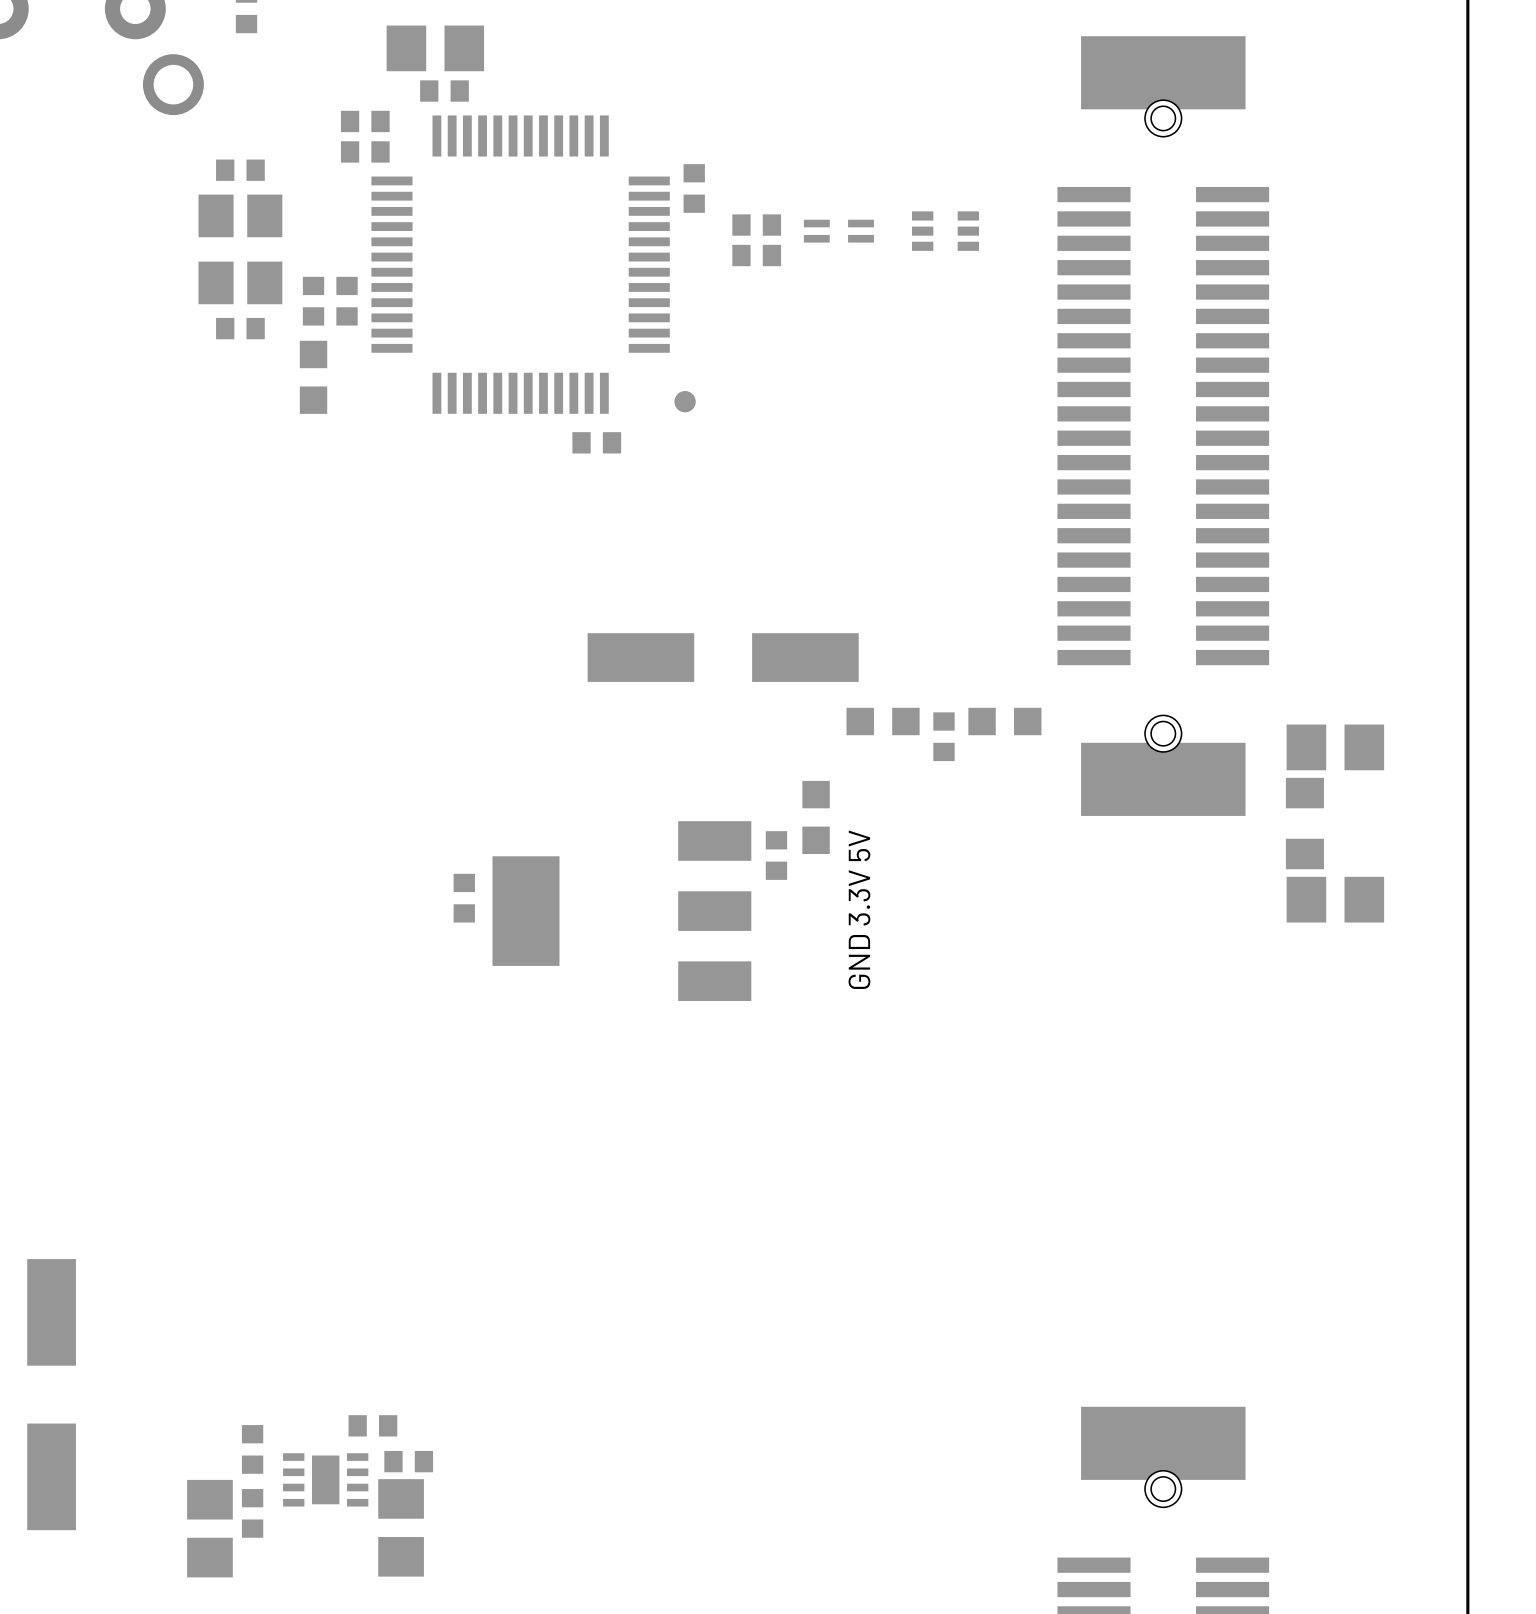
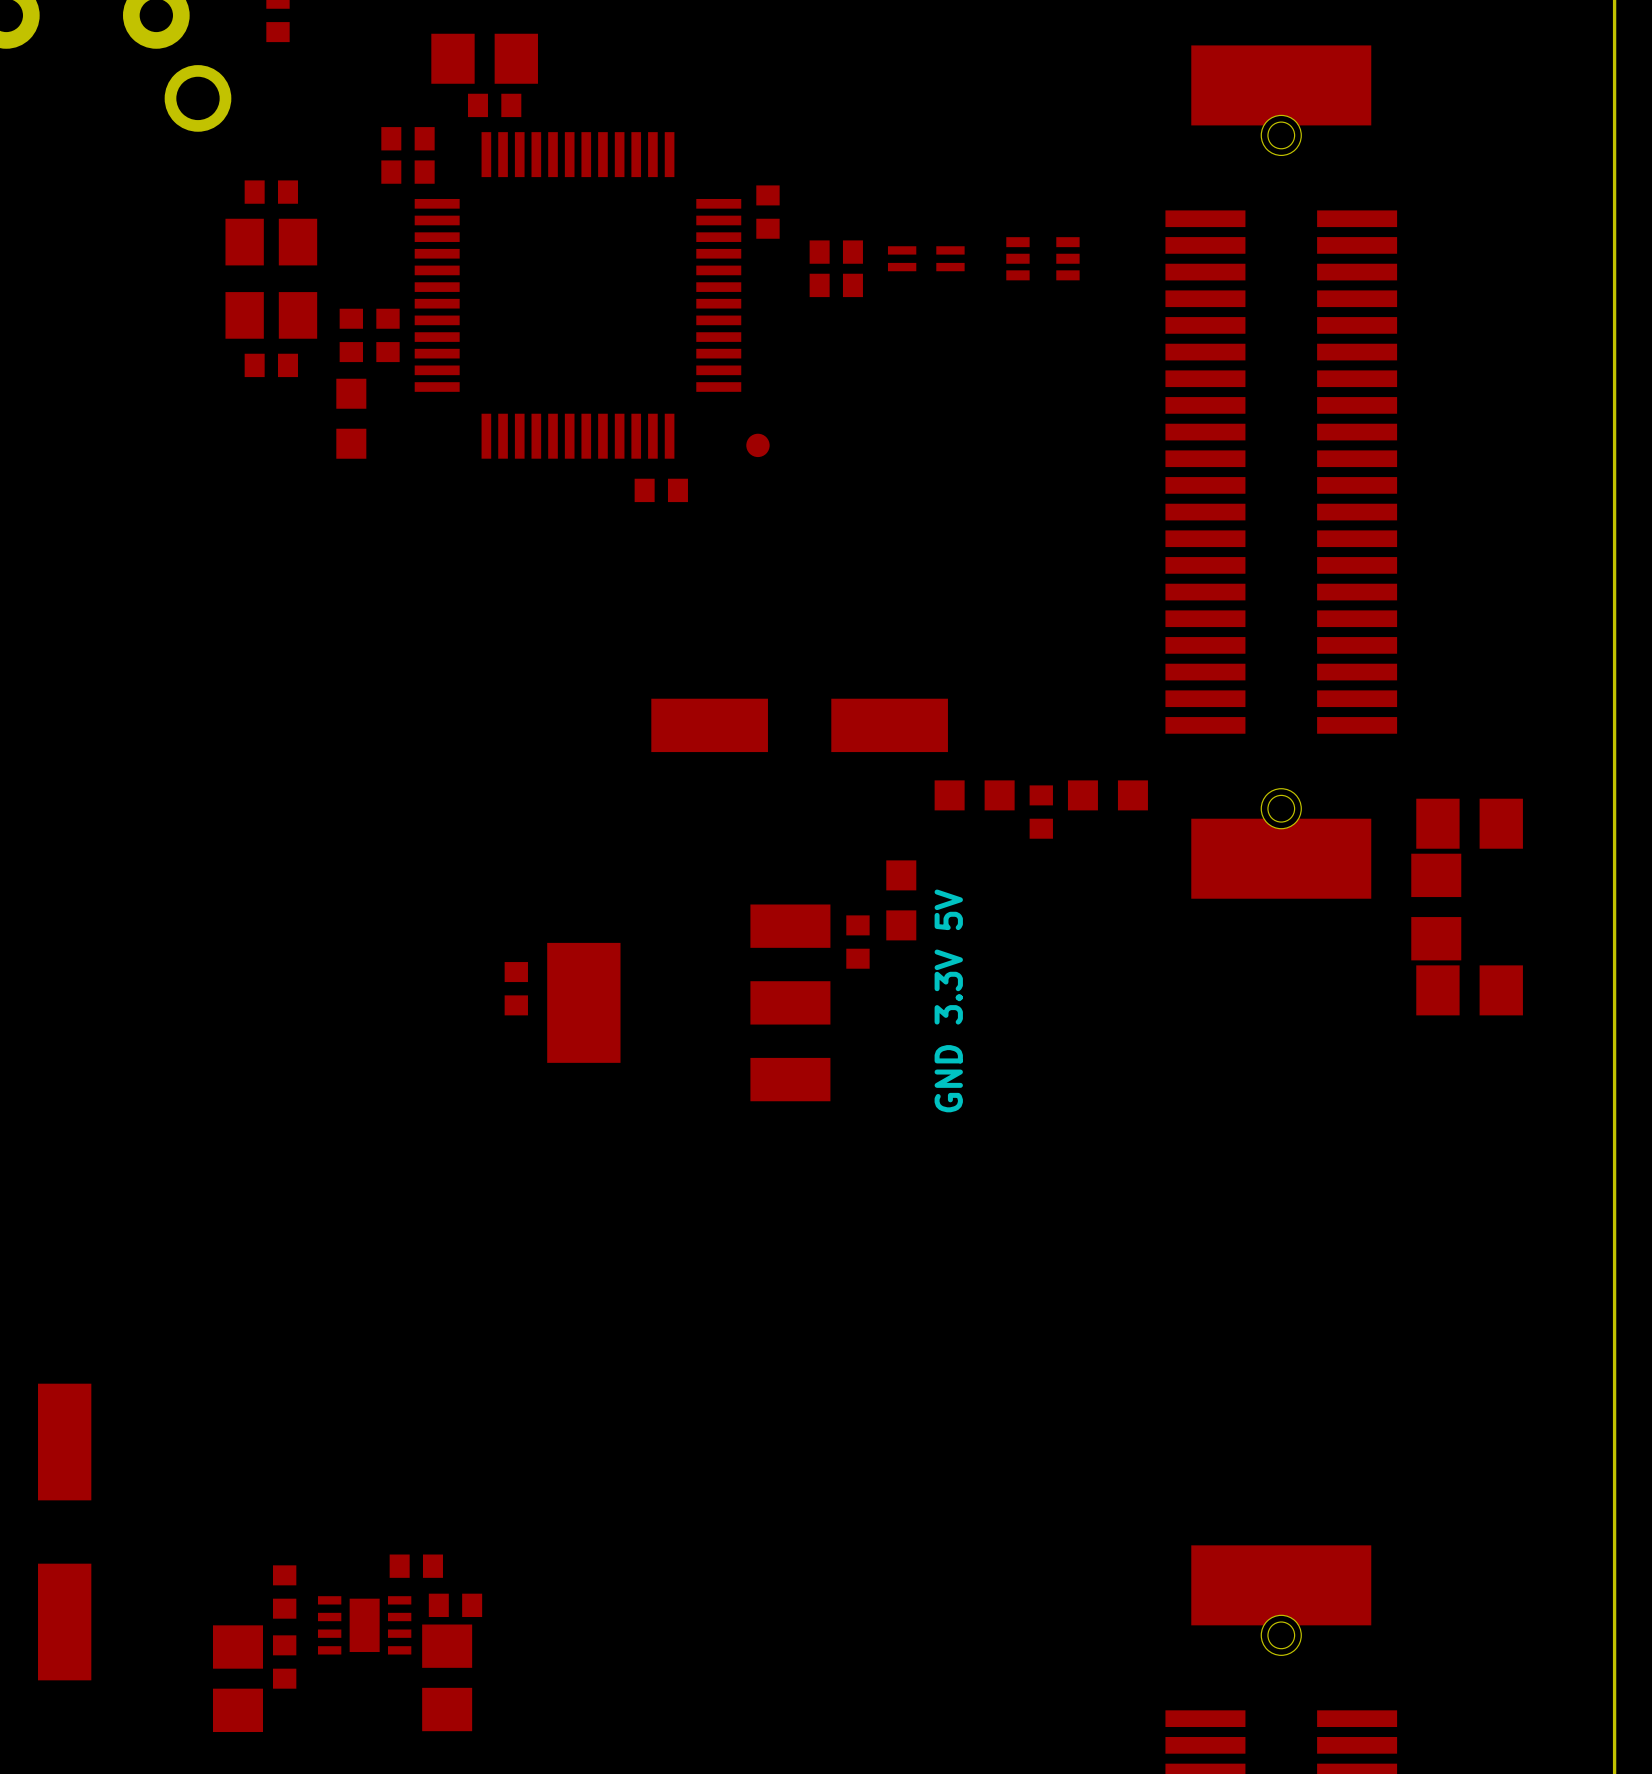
part footprint: [1285, 777, 1324, 870] -> [1411, 853, 1462, 961]

